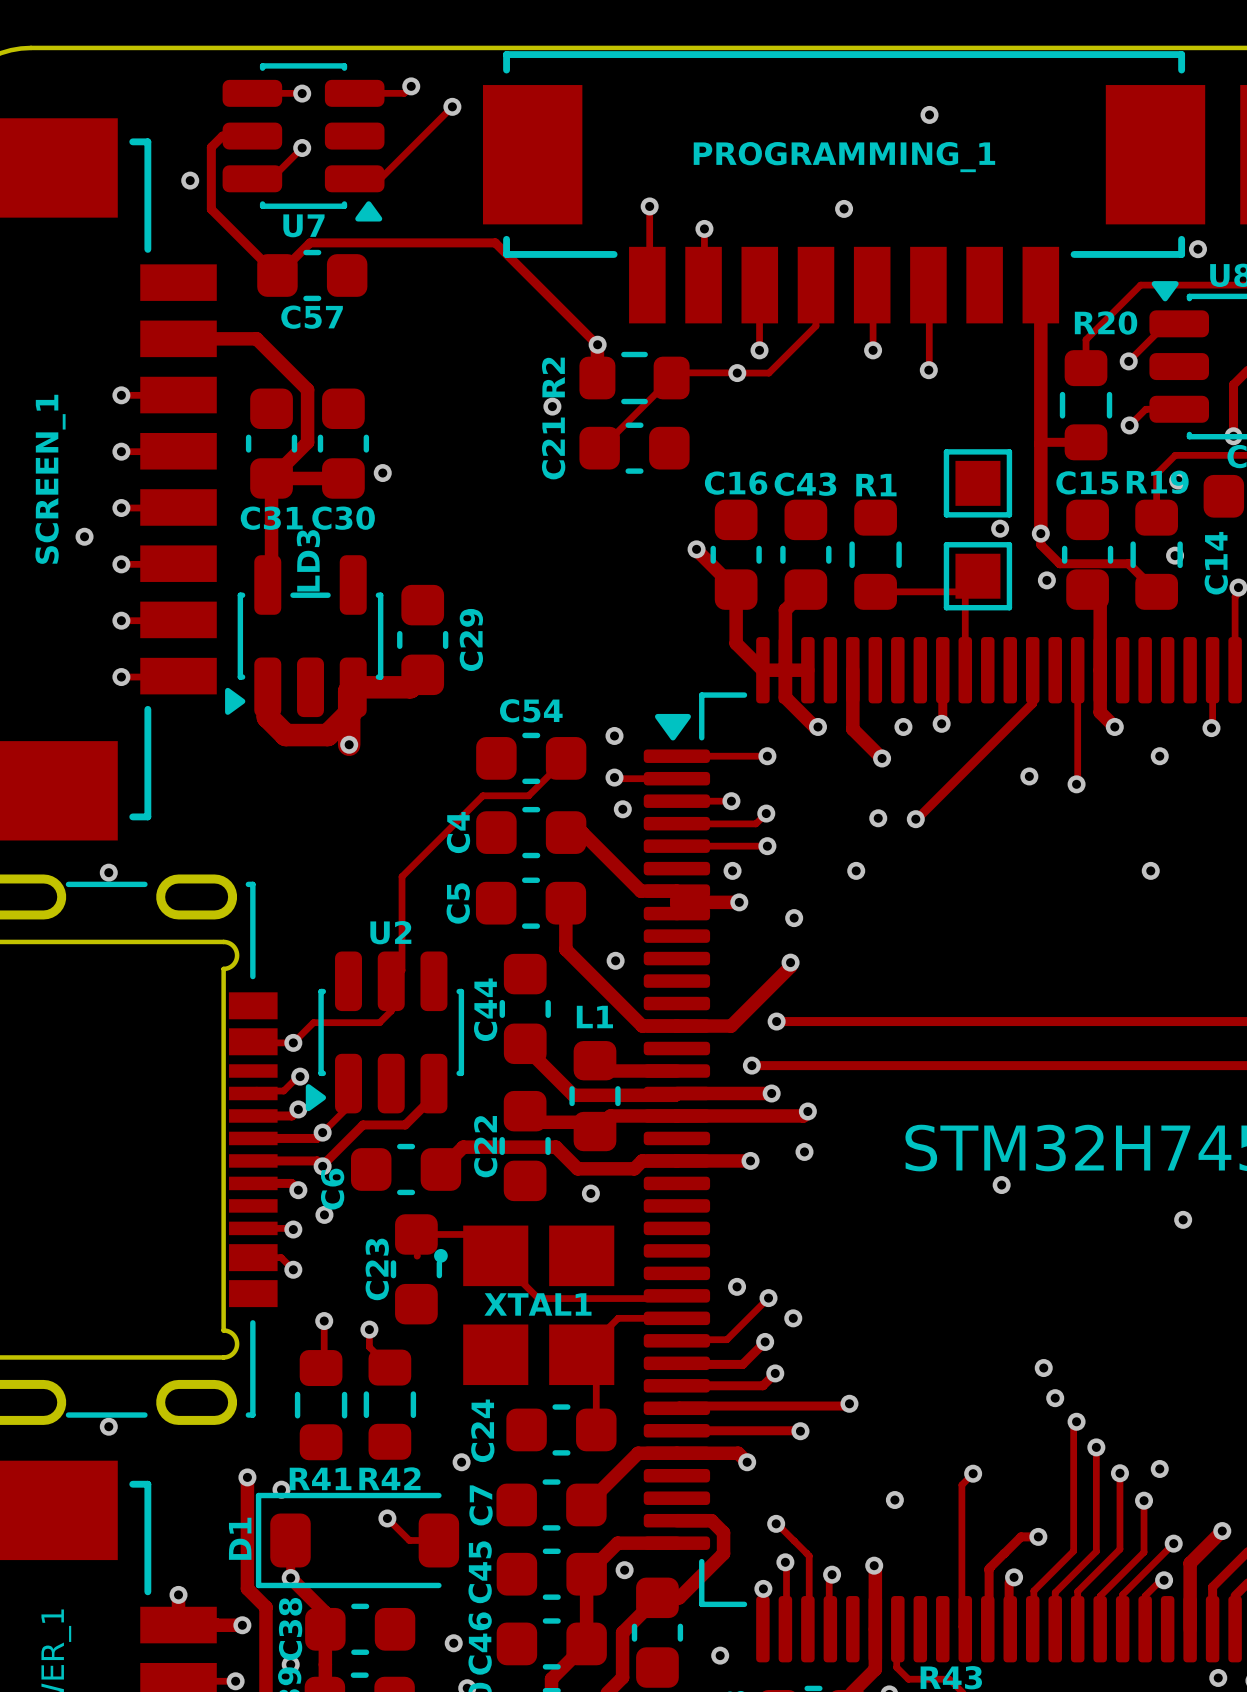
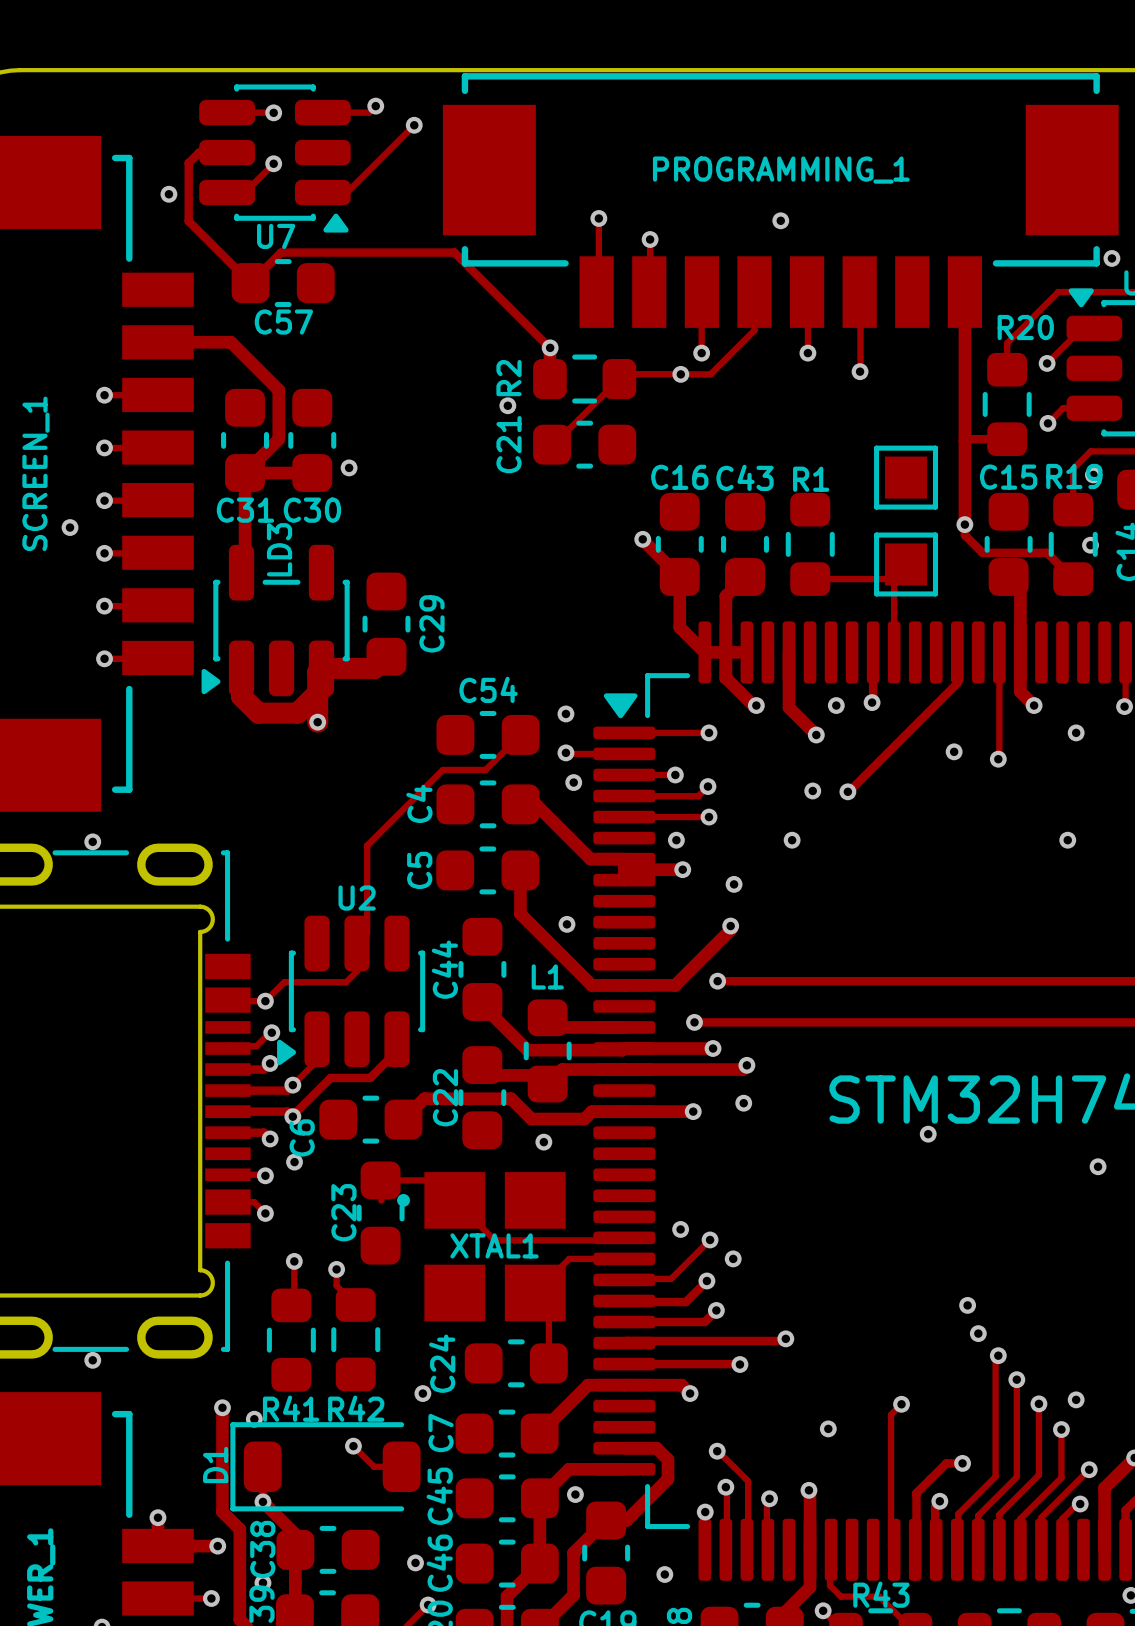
via: (929, 114) -> none
via: (1000, 528) -> none
via: (1046, 580) -> none

